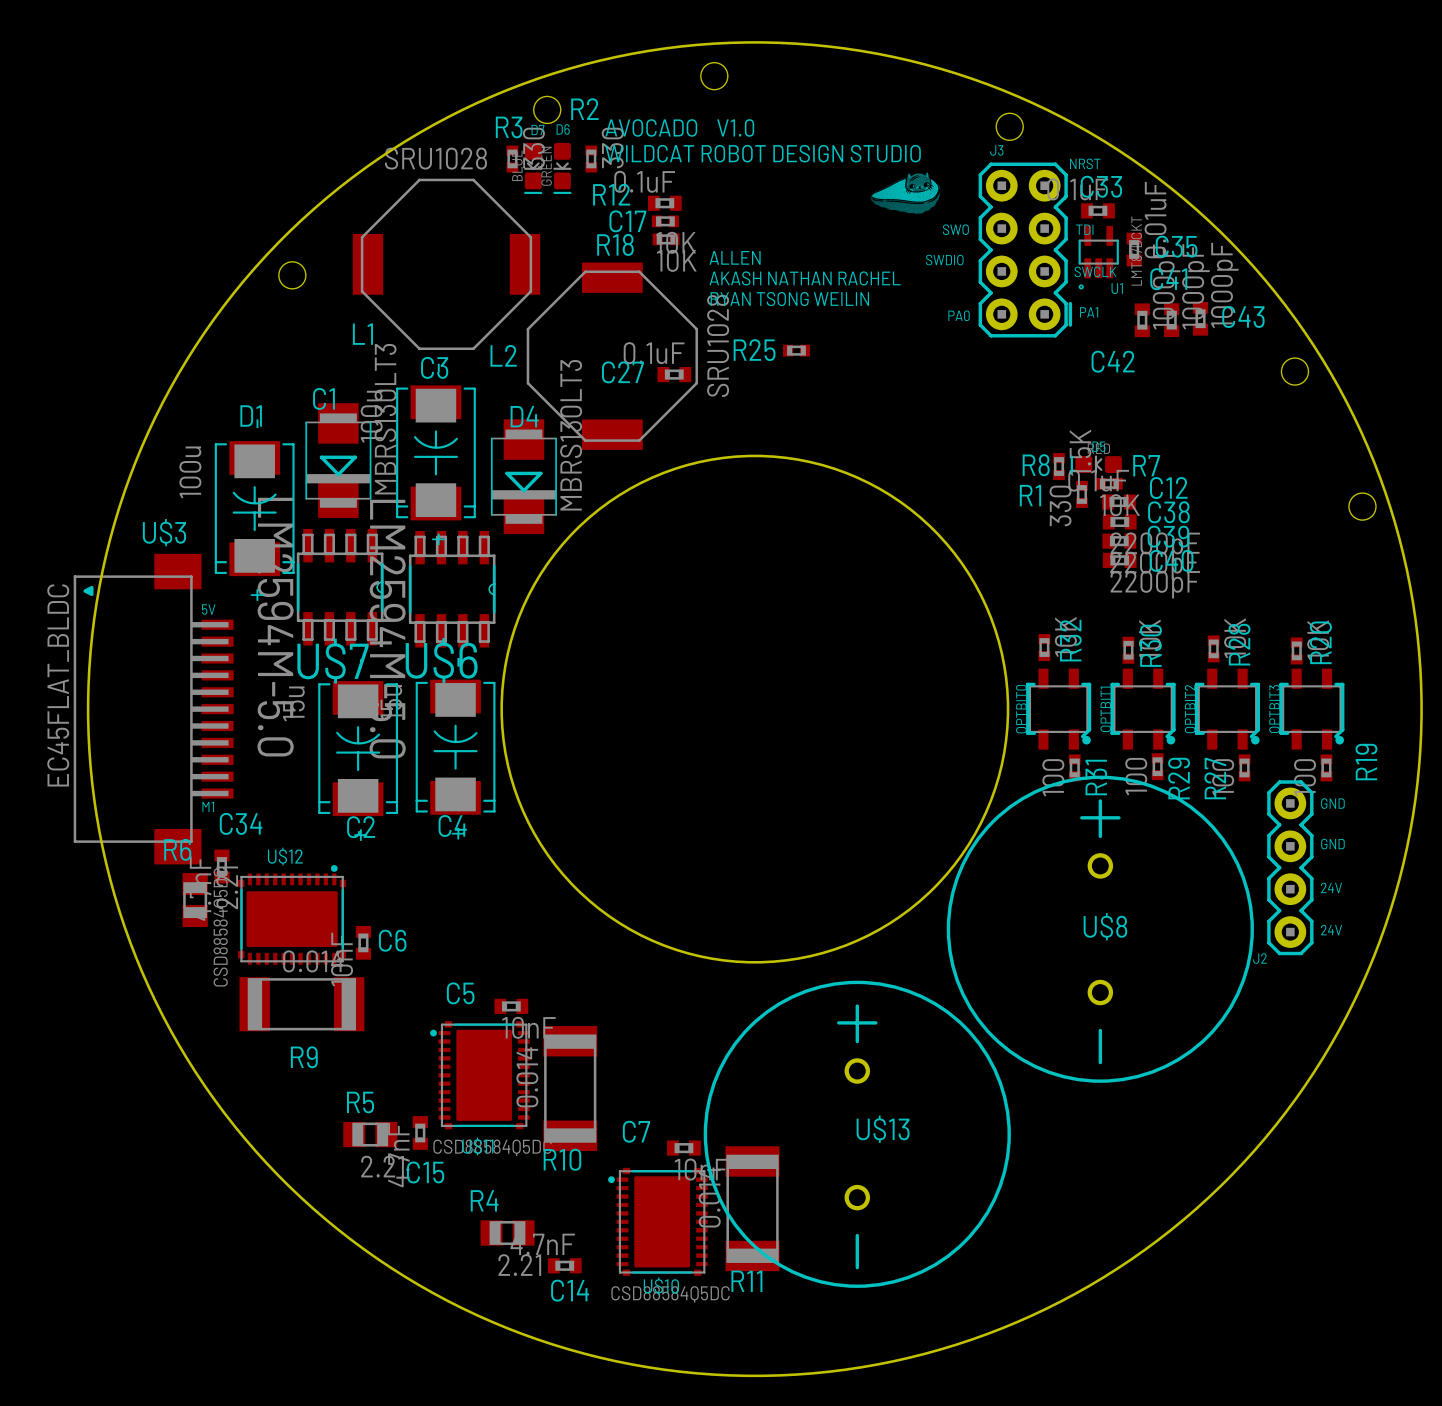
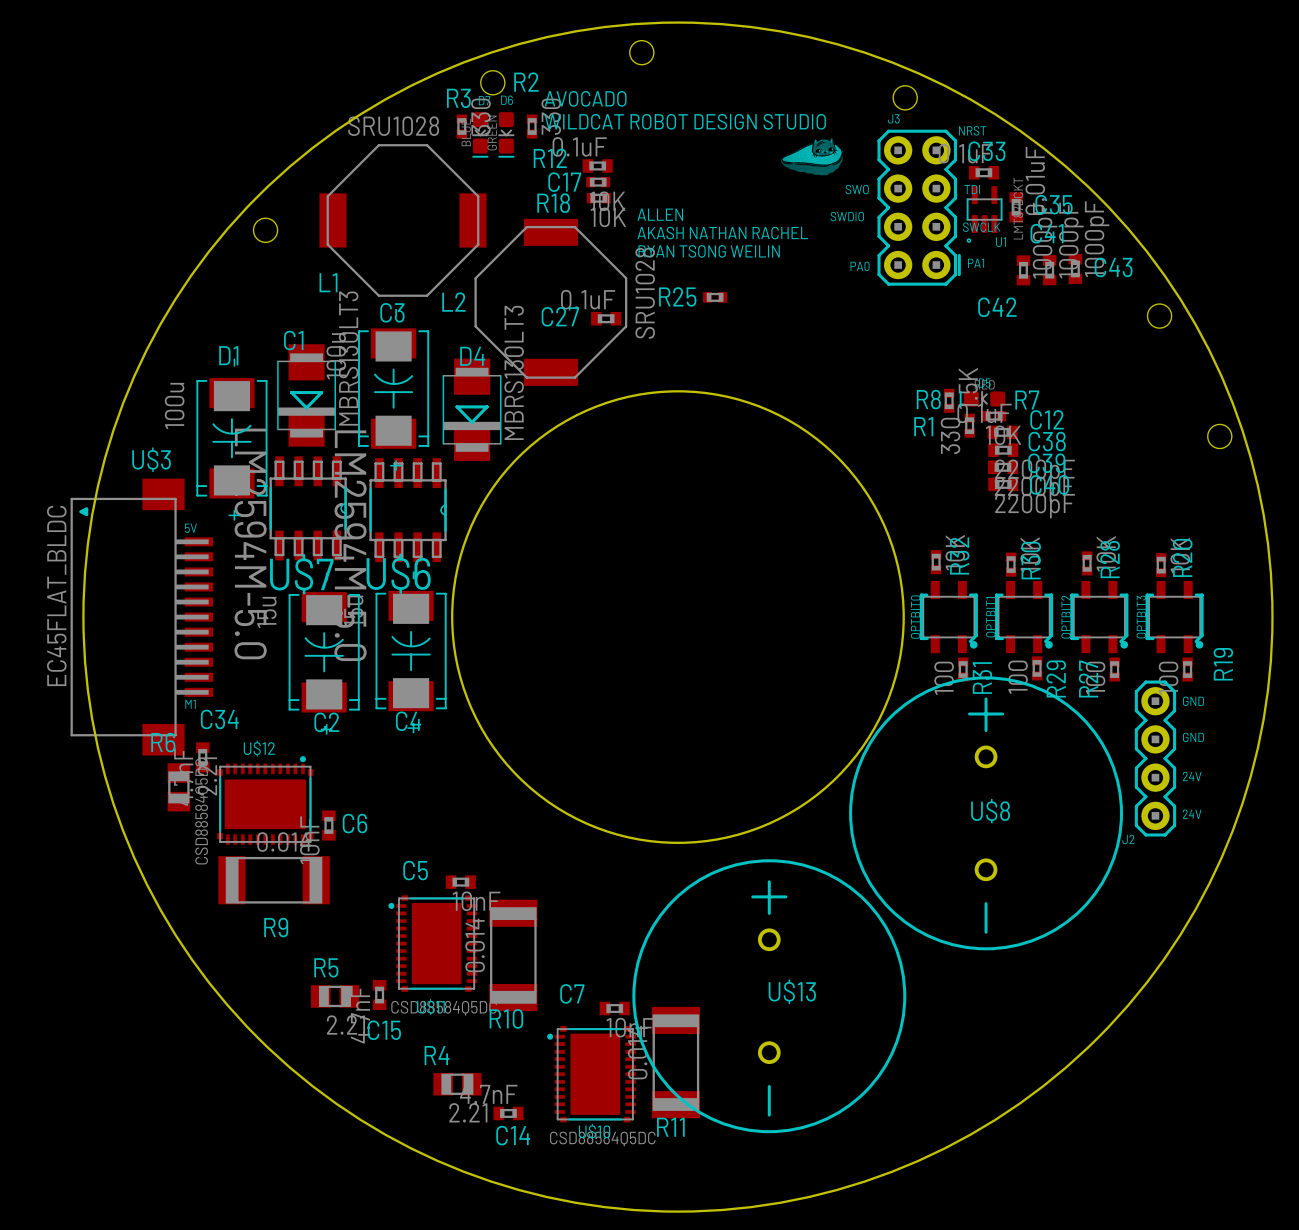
text: AVOCADO V1.0 (679, 127) -> AVOCADO (585, 98)

